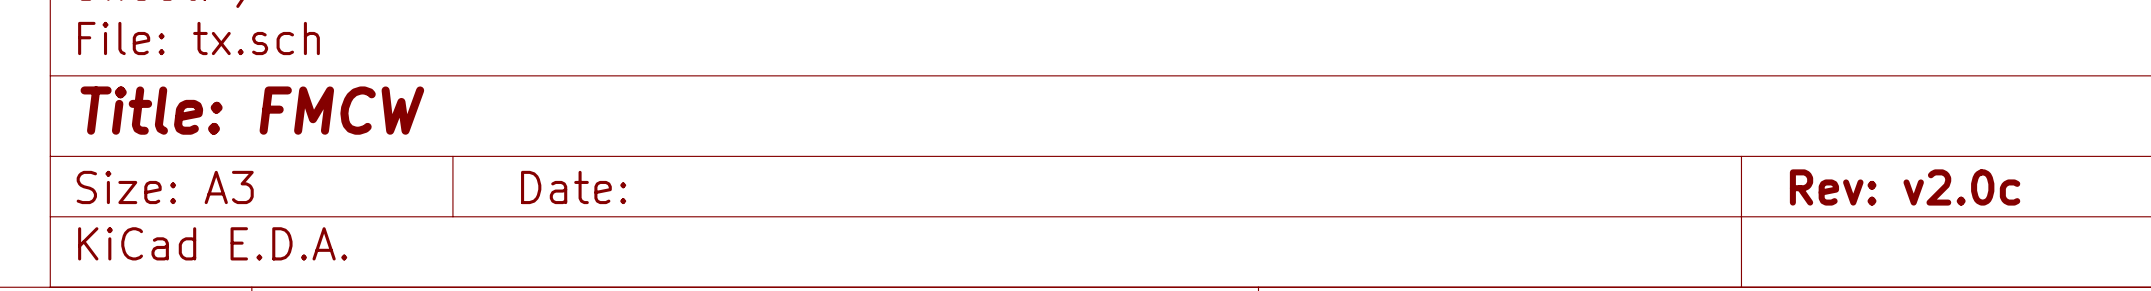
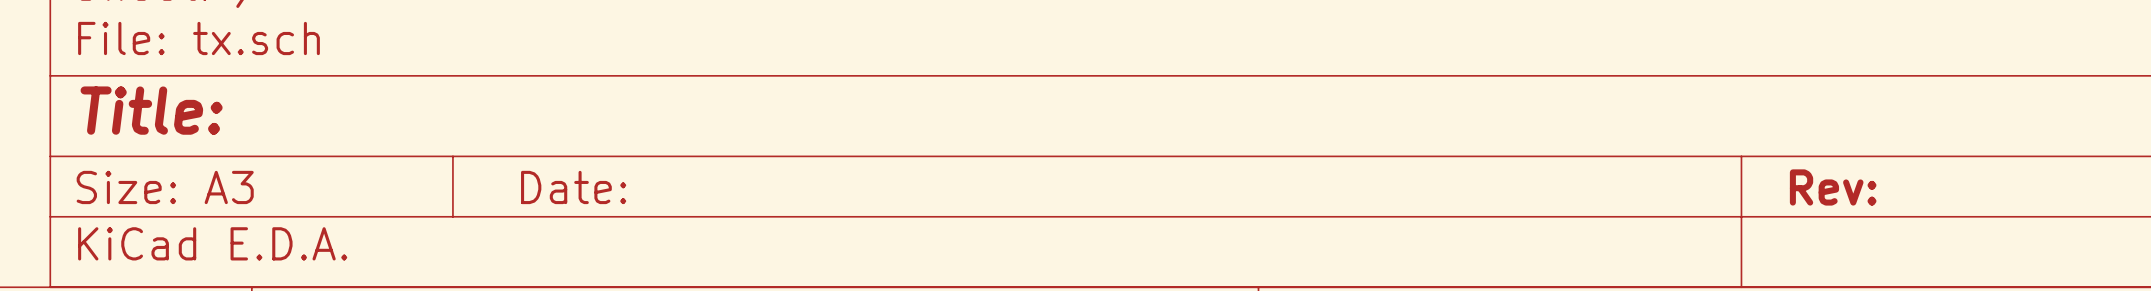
title block: Title: FMCW (252, 110) -> Title: (151, 110)
title block: Rev: v2.0c (1905, 187) -> Rev: (1833, 187)

